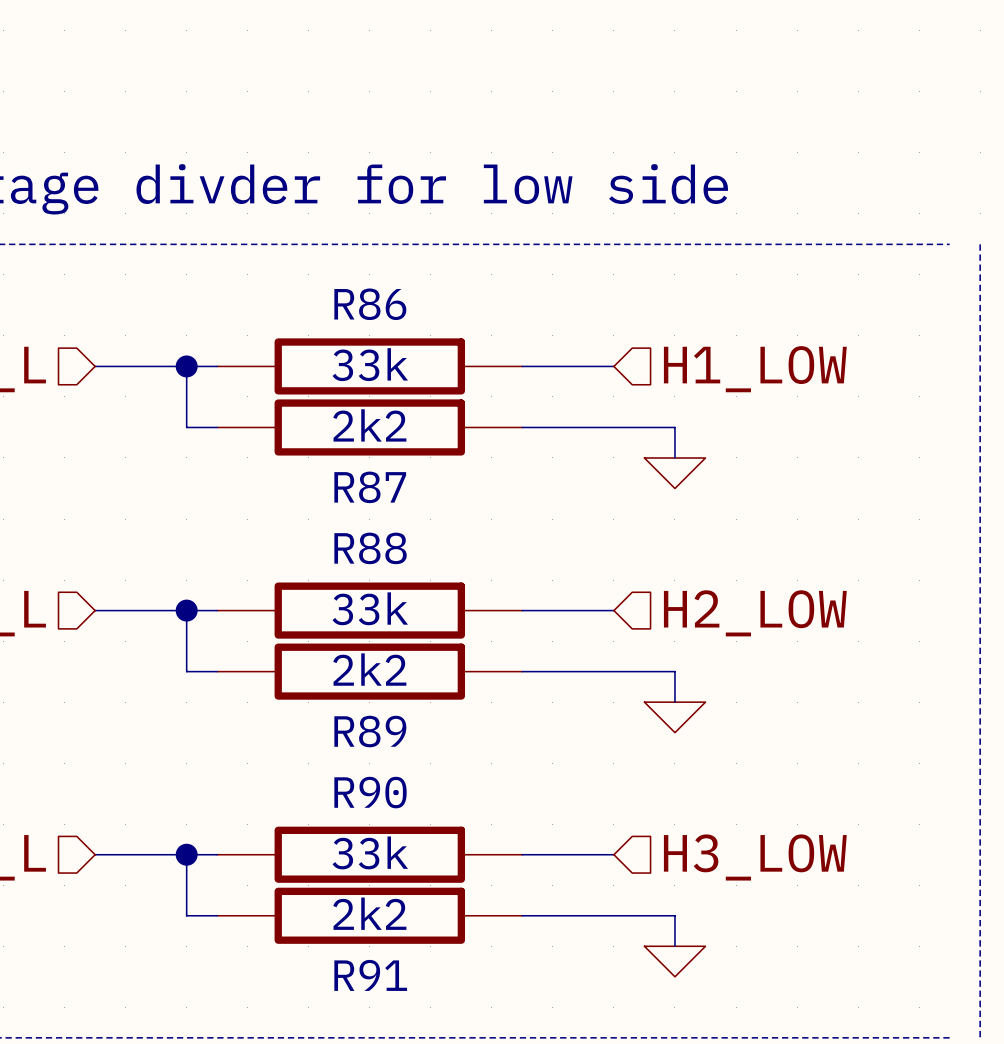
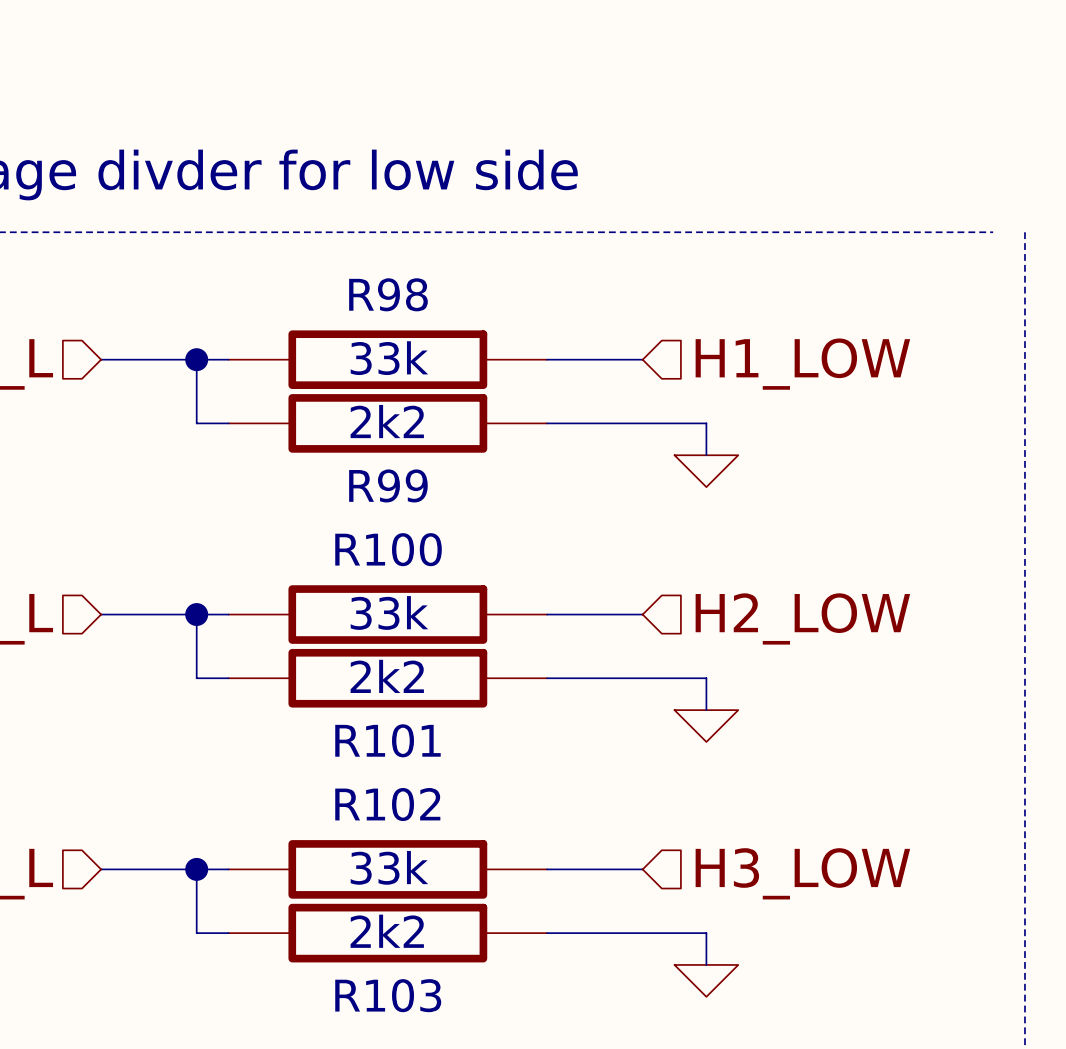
R86 name: R86 (370, 304) -> R98 (388, 294)
R87 name: R87 (370, 487) -> R99 (388, 485)
R88 name: R88 (370, 548) -> R100 (388, 549)
R89 name: R89 (370, 731) -> R101 (387, 740)
R90 name: R90 (370, 792) -> R102 (387, 804)
R91 name: R91 (370, 975) -> R103 (388, 995)

